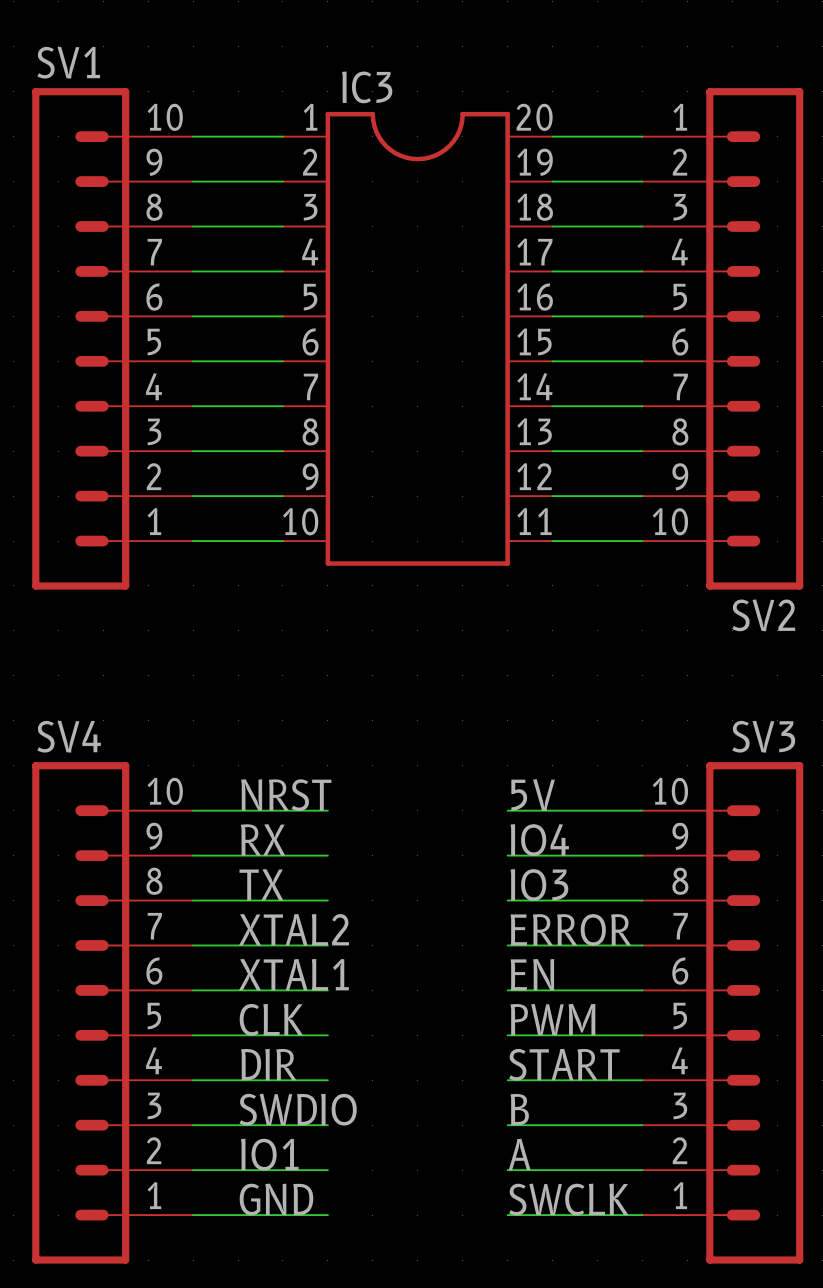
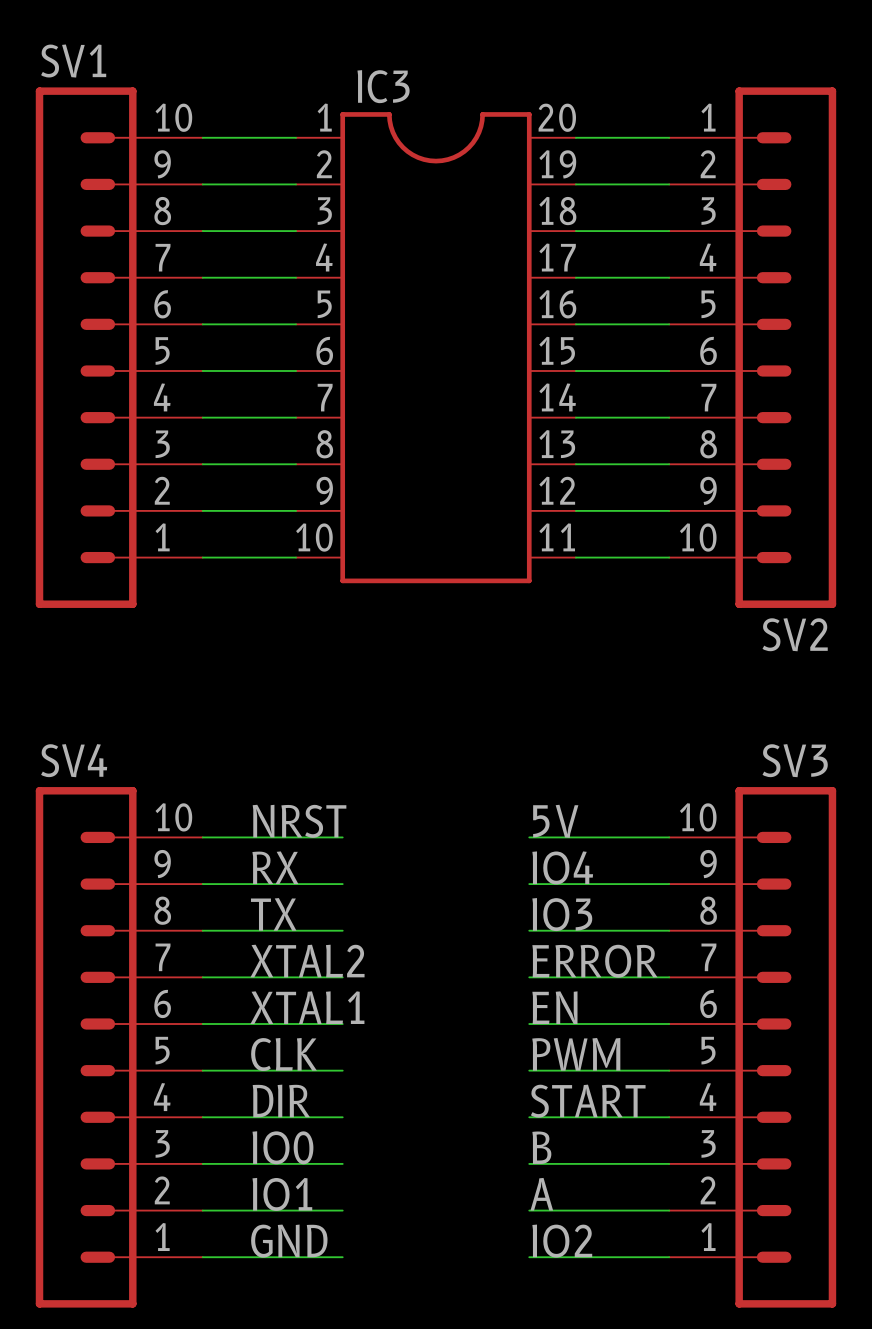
label: SWDIO (298, 1109) -> IO0 (282, 1147)
label: SWCLK (568, 1199) -> IO2 (562, 1241)

